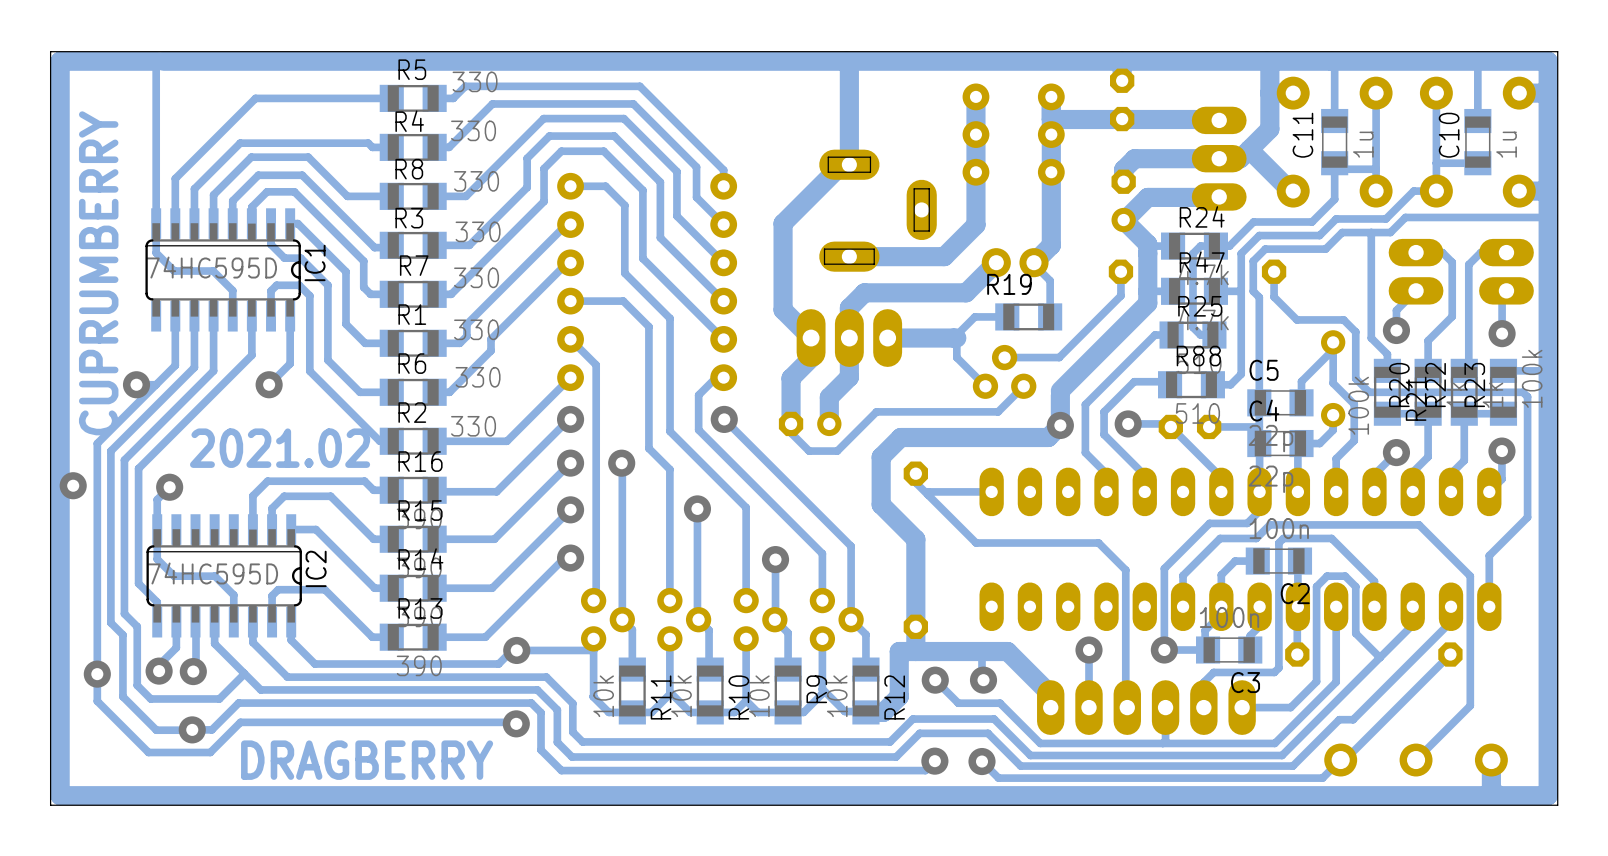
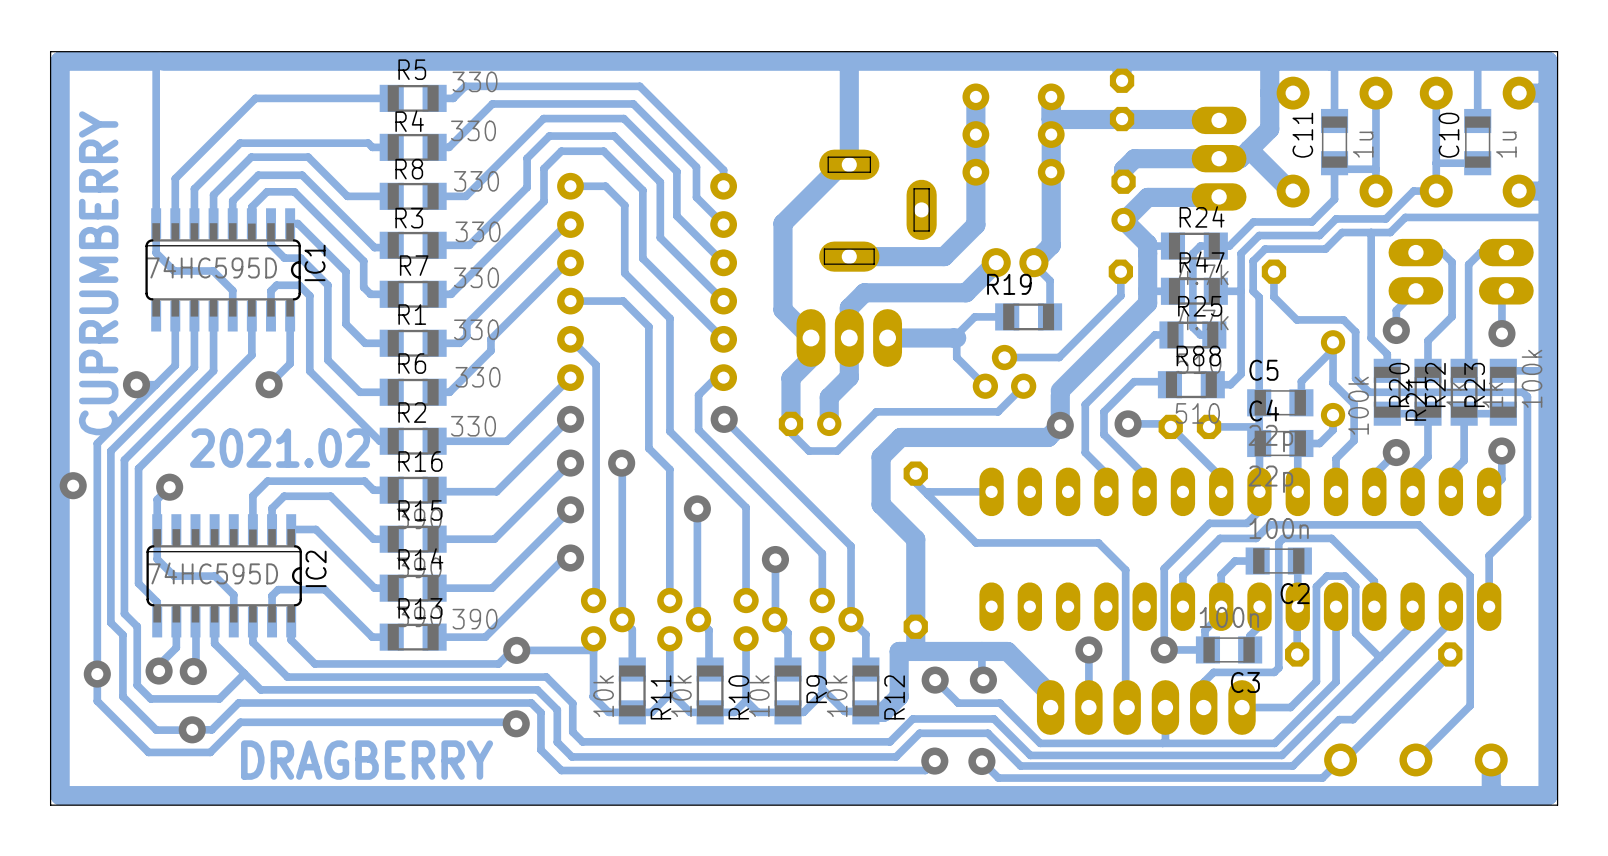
R13 value position: 390 (419, 665) -> 390 (474, 619)

